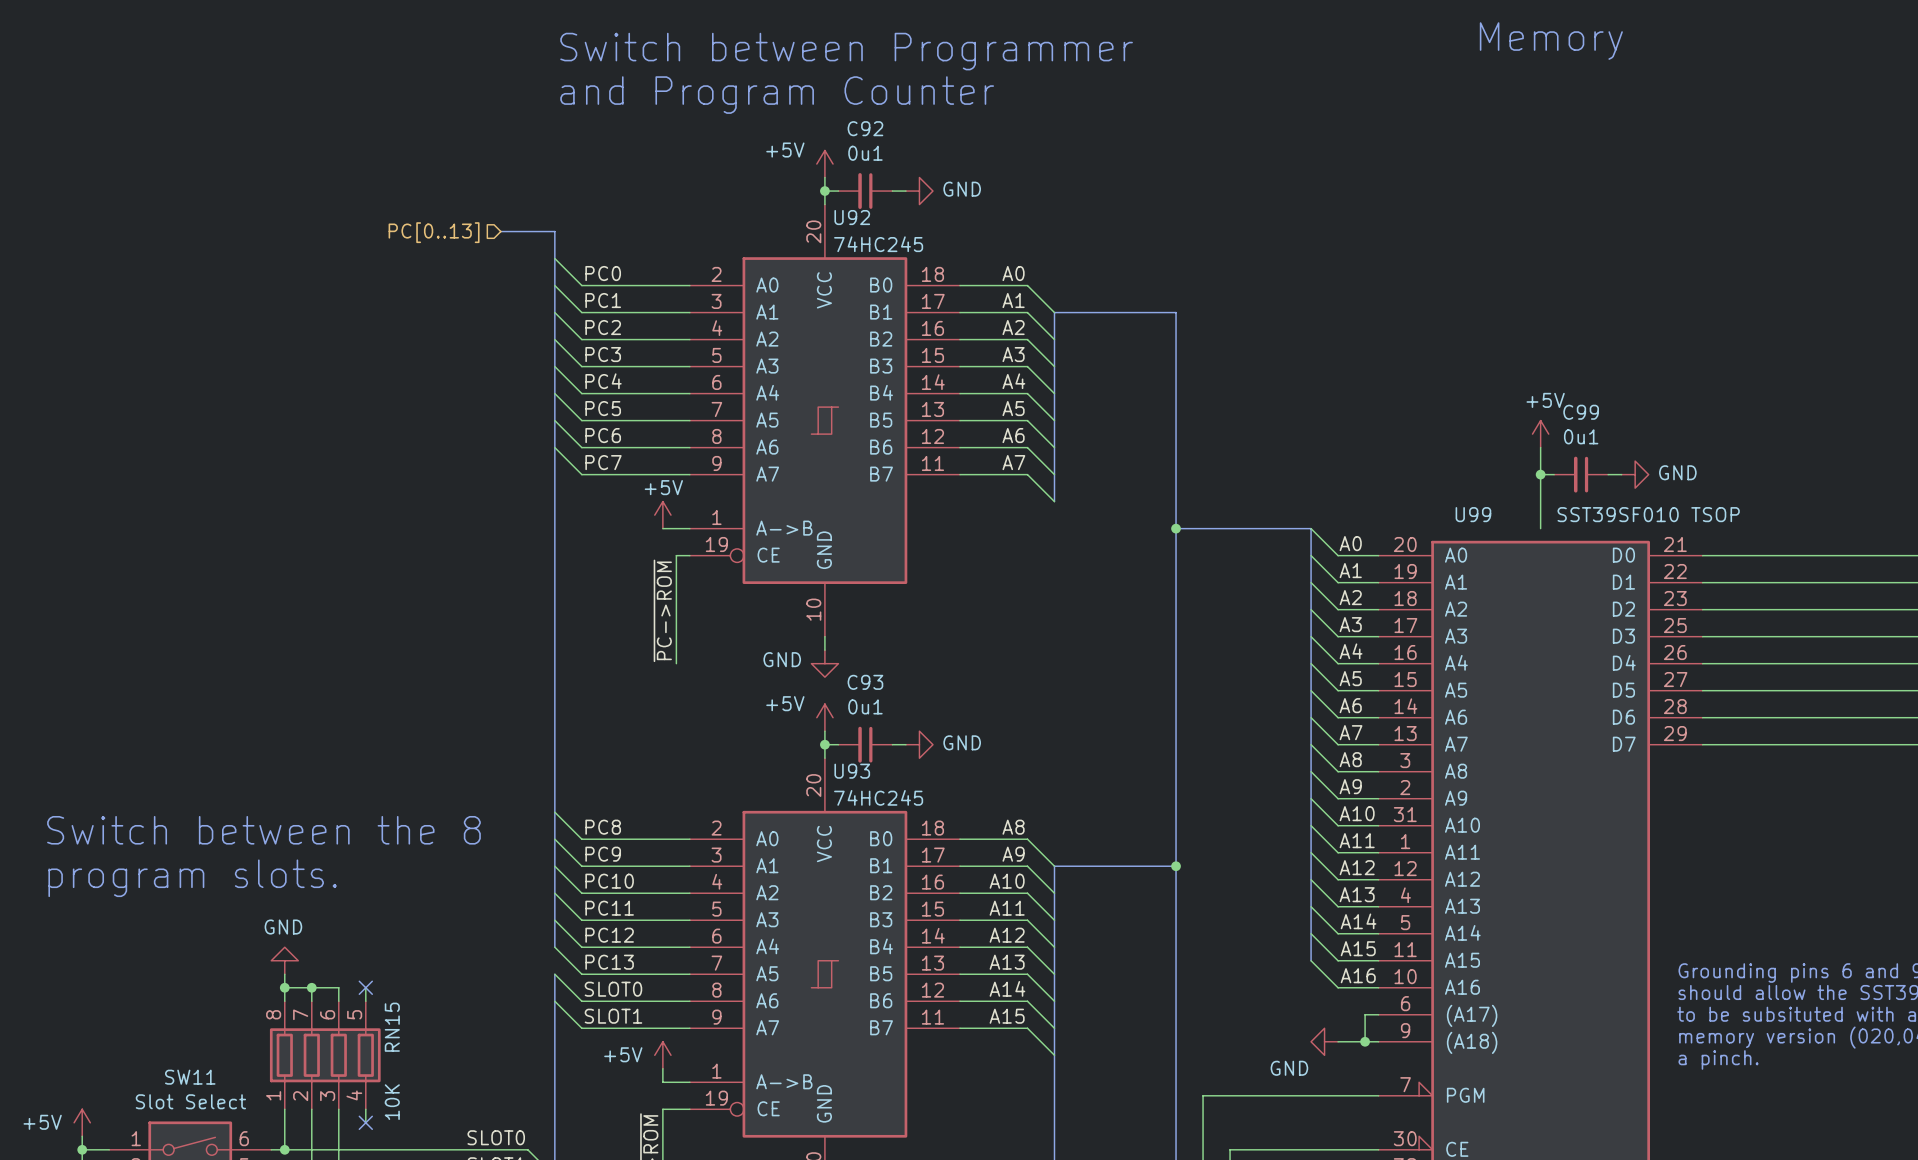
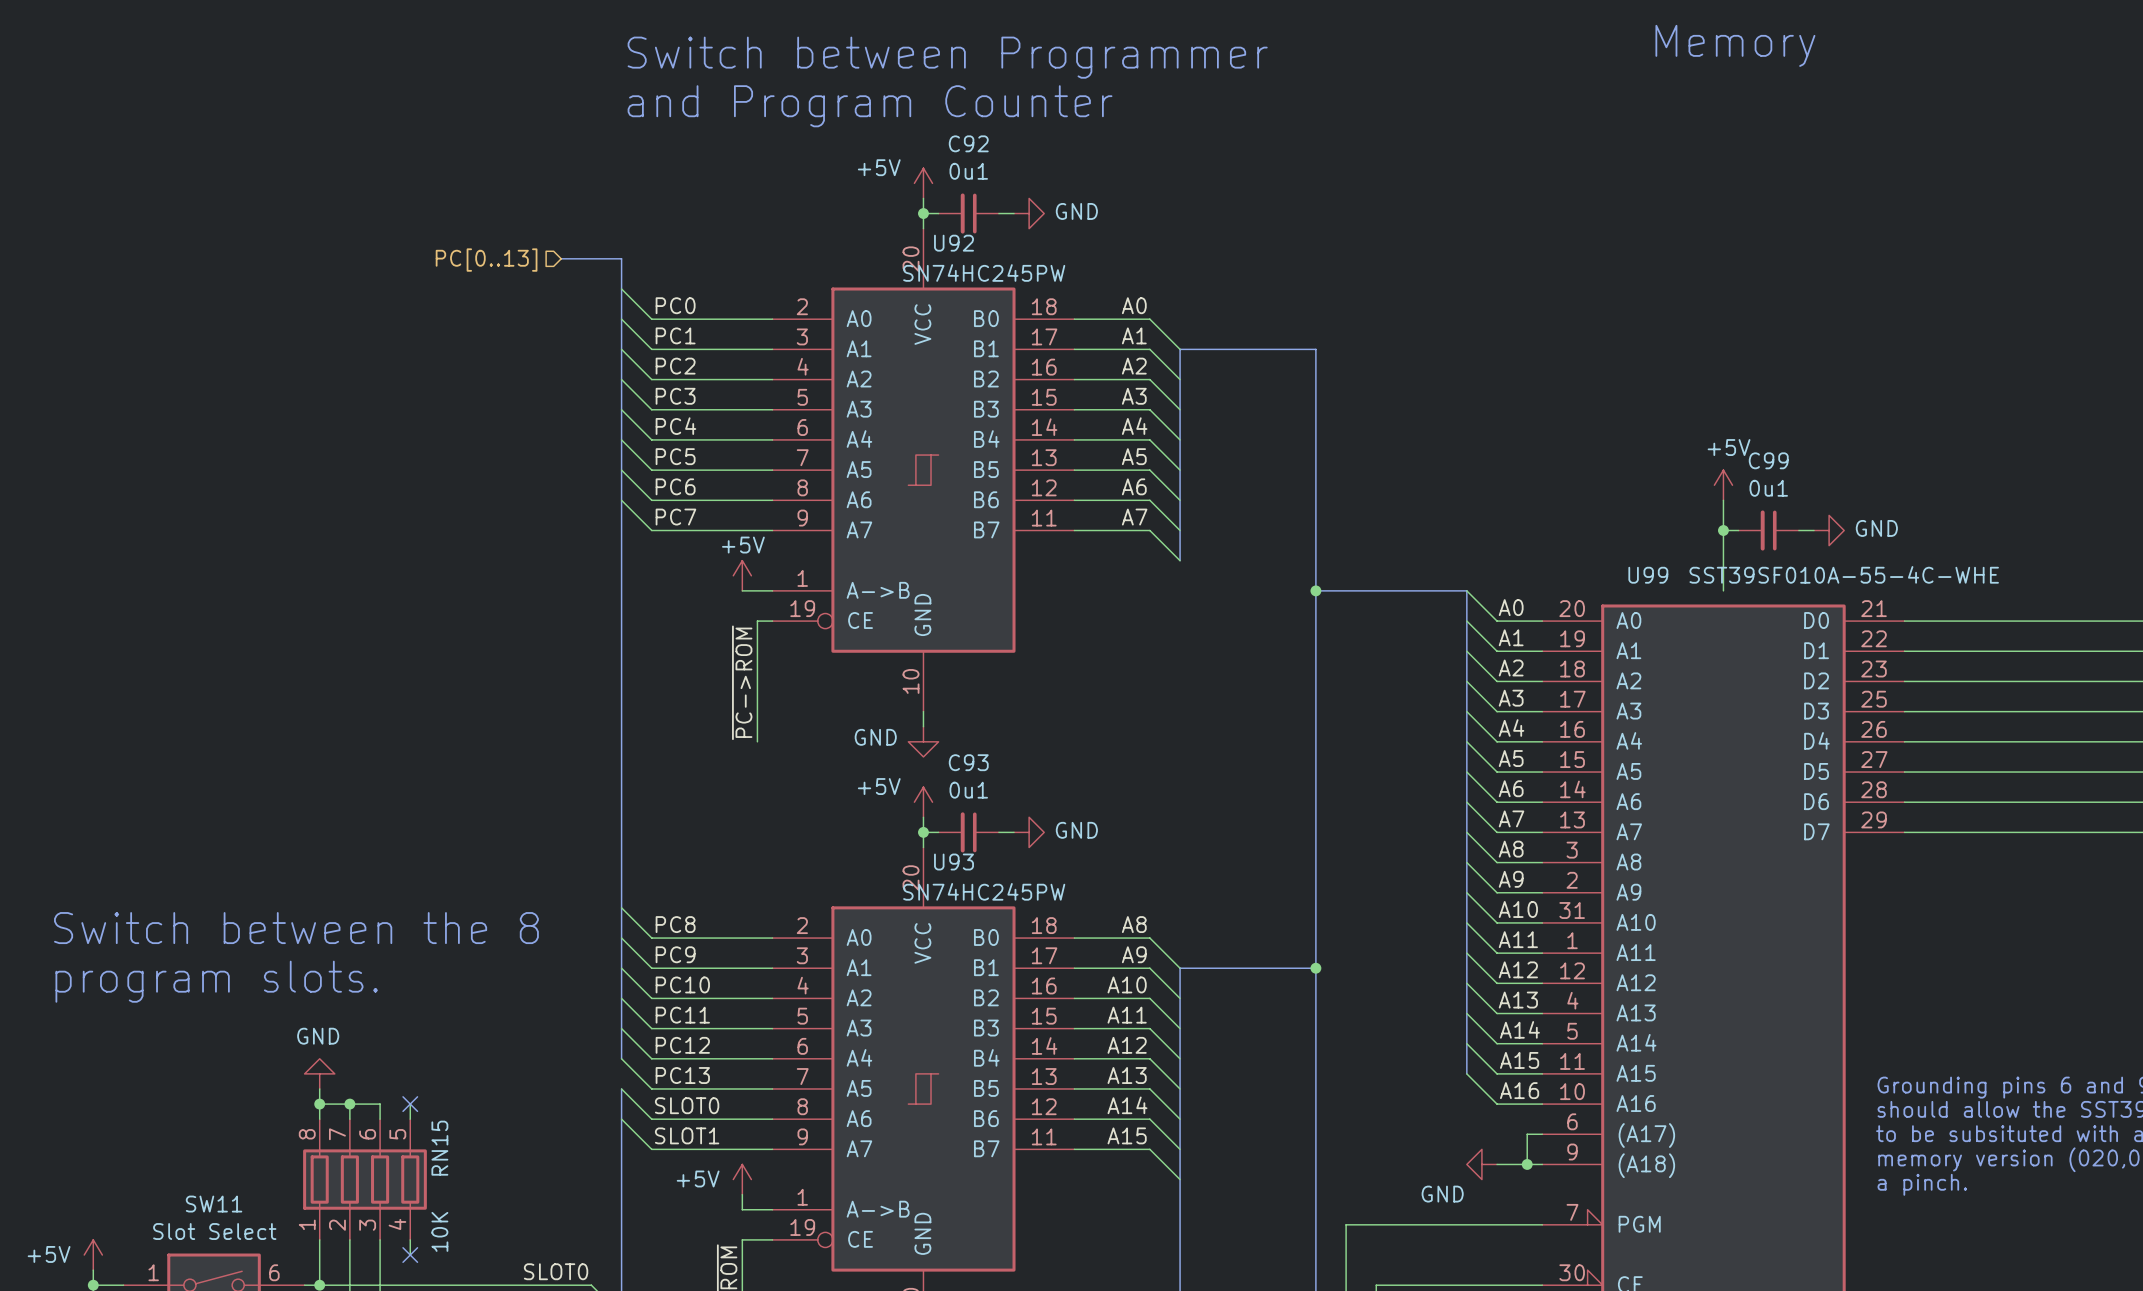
U92 value: 74HC245 (878, 244) -> SN74HC245PW (984, 272)
U99 value: SST39SF010 TSOP (1648, 514) -> SST39SF010A-55-4C-WHE (1844, 574)
U93 value: 74HC245 (878, 797) -> SN74HC245PW (984, 891)

